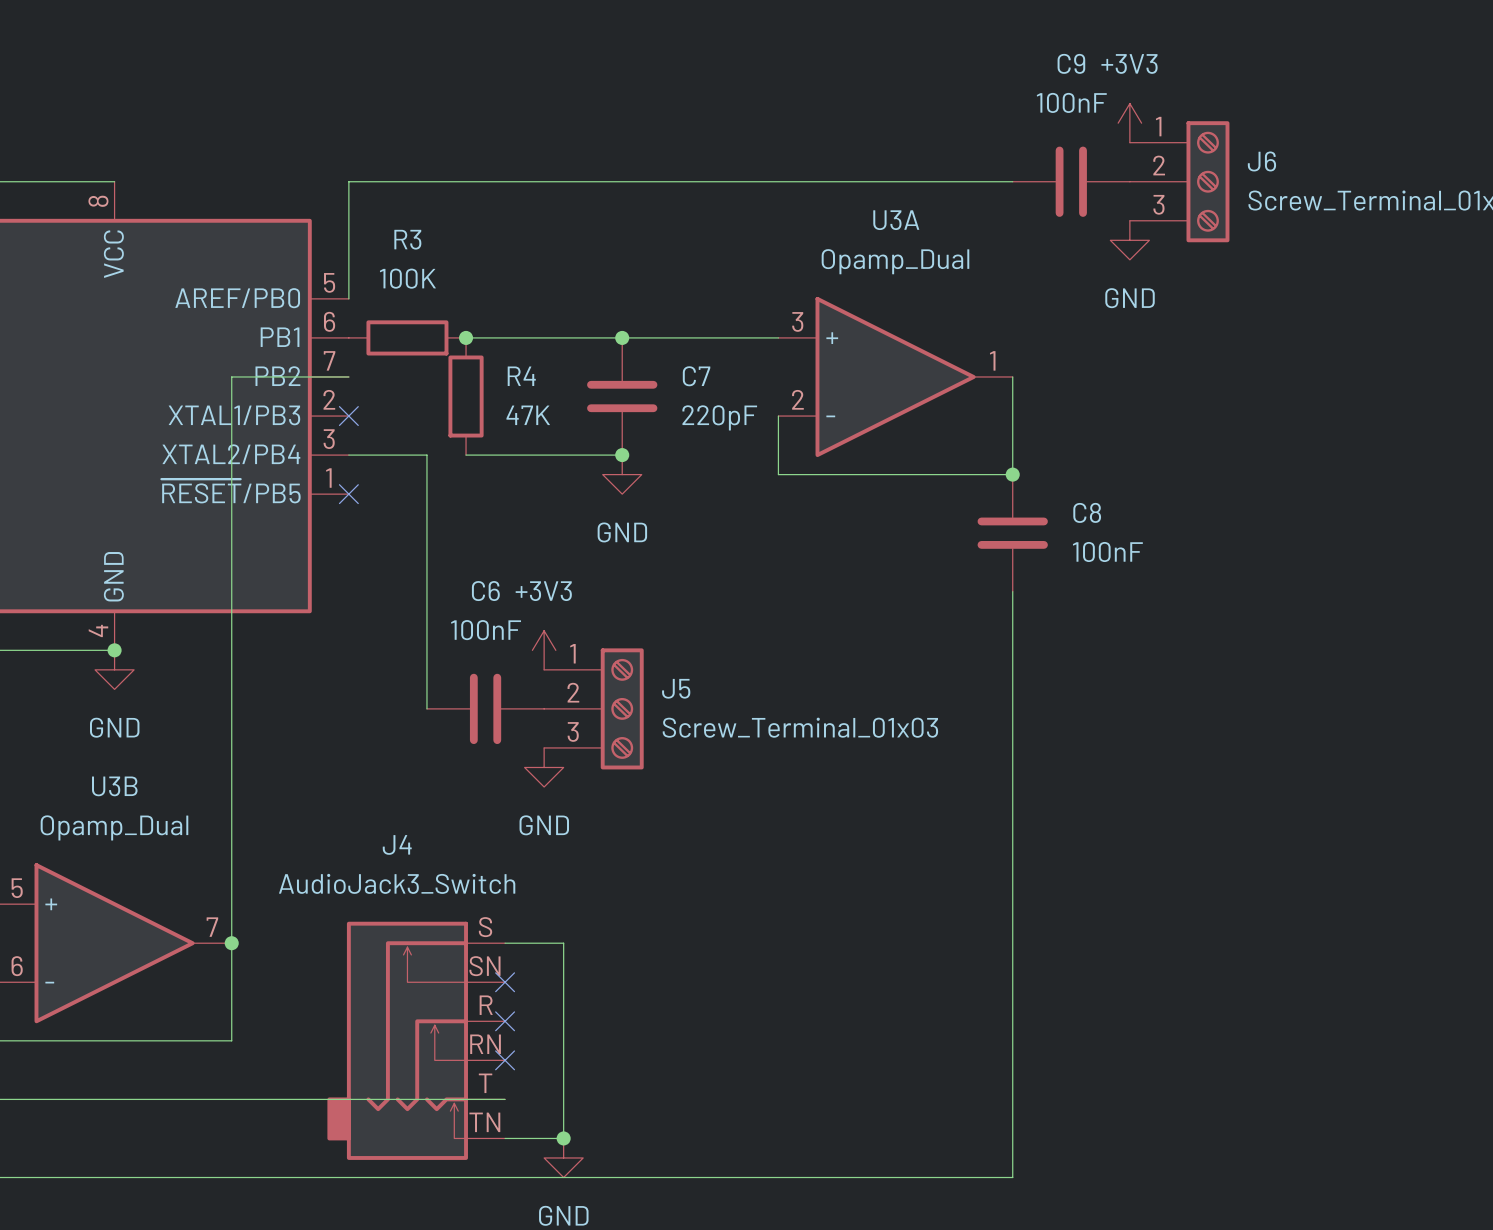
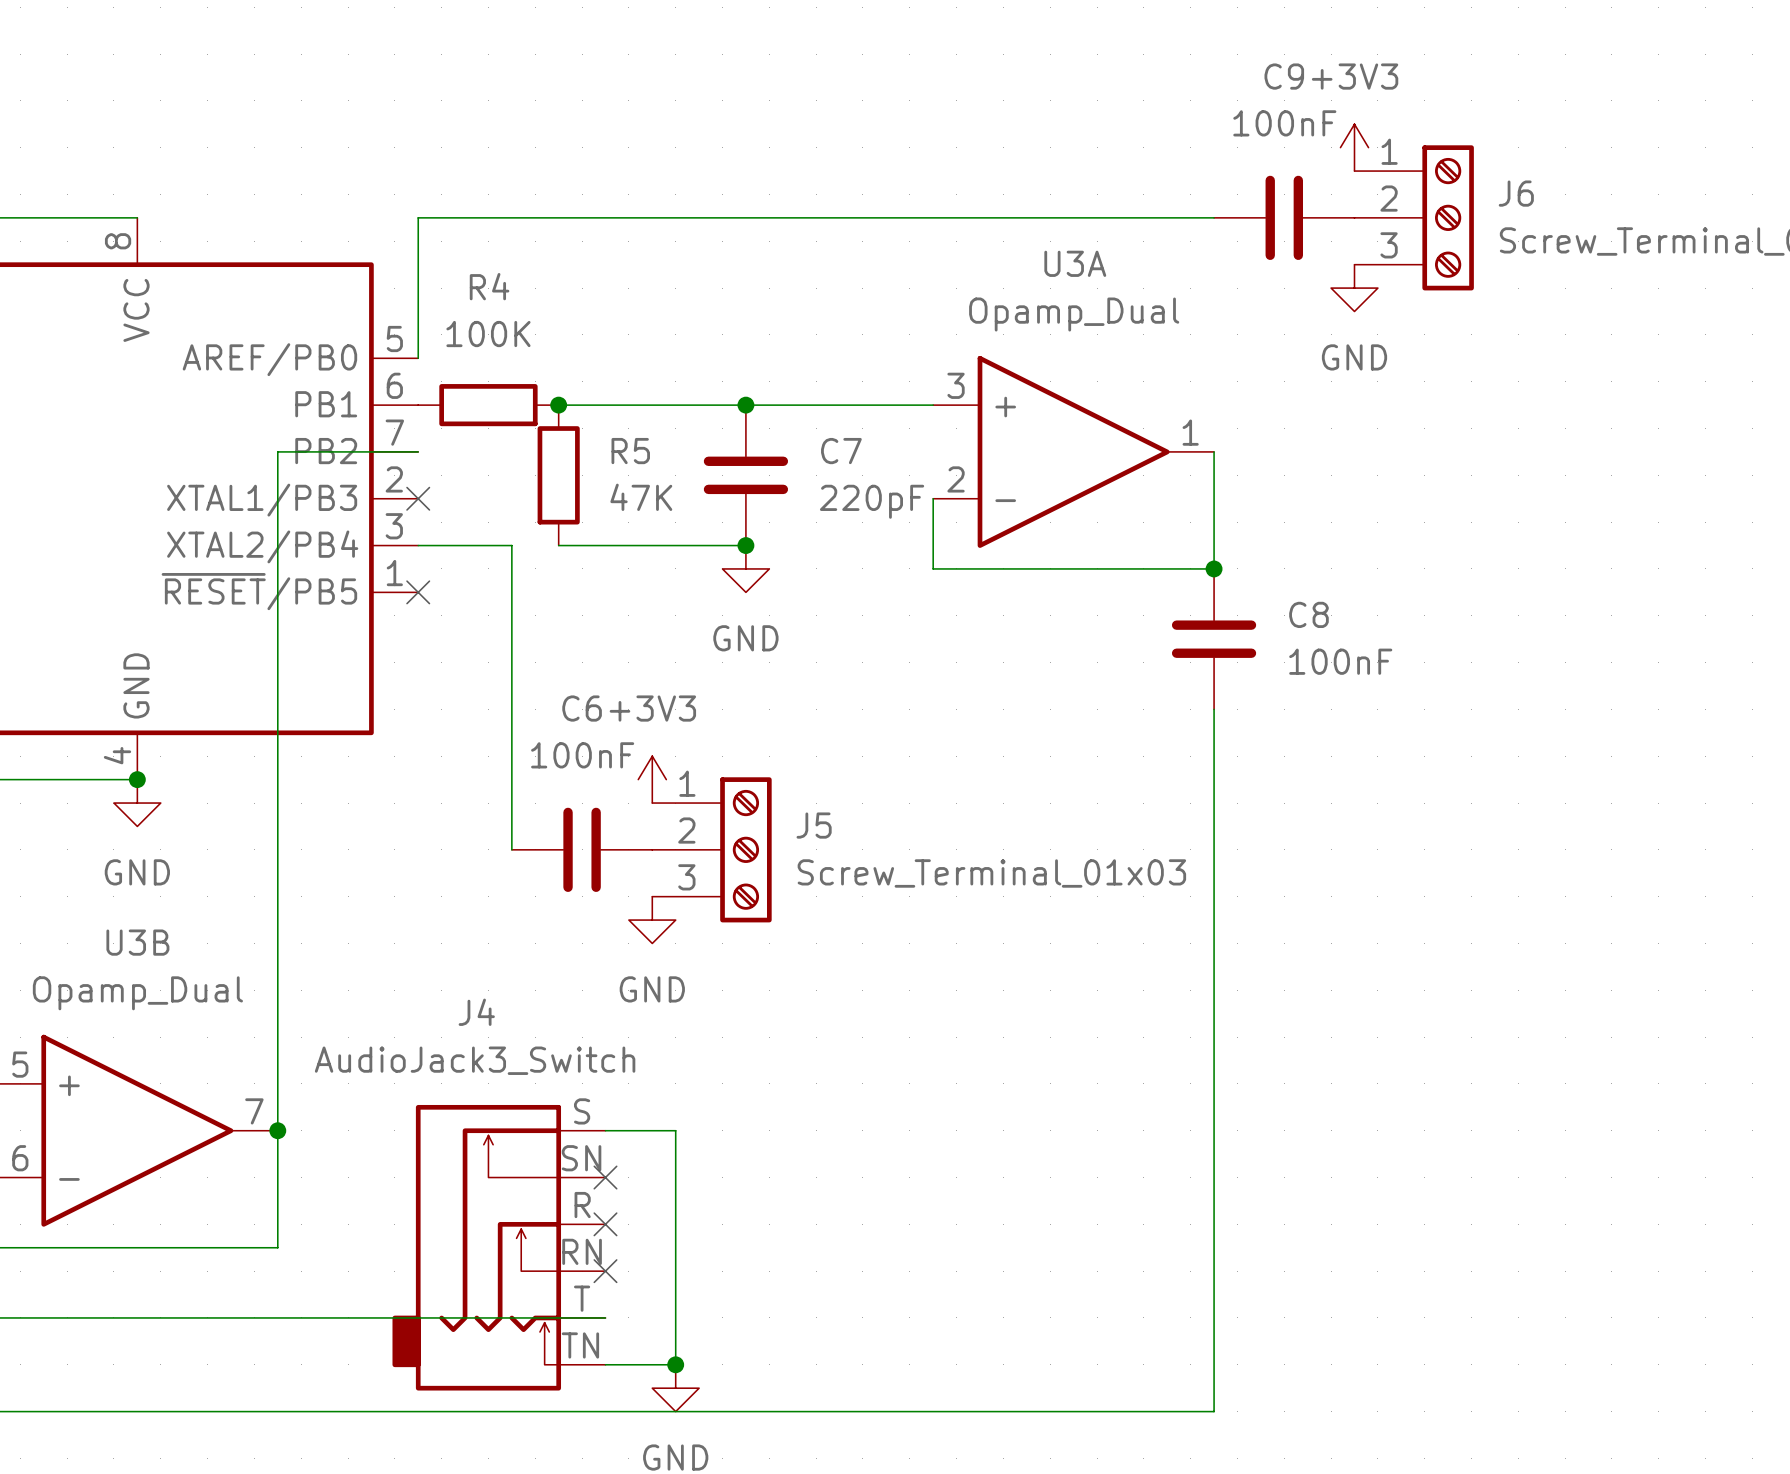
R3 name: R3 (407, 239) -> R4 (489, 286)
R4 name: R4 (521, 376) -> R5 (630, 451)

